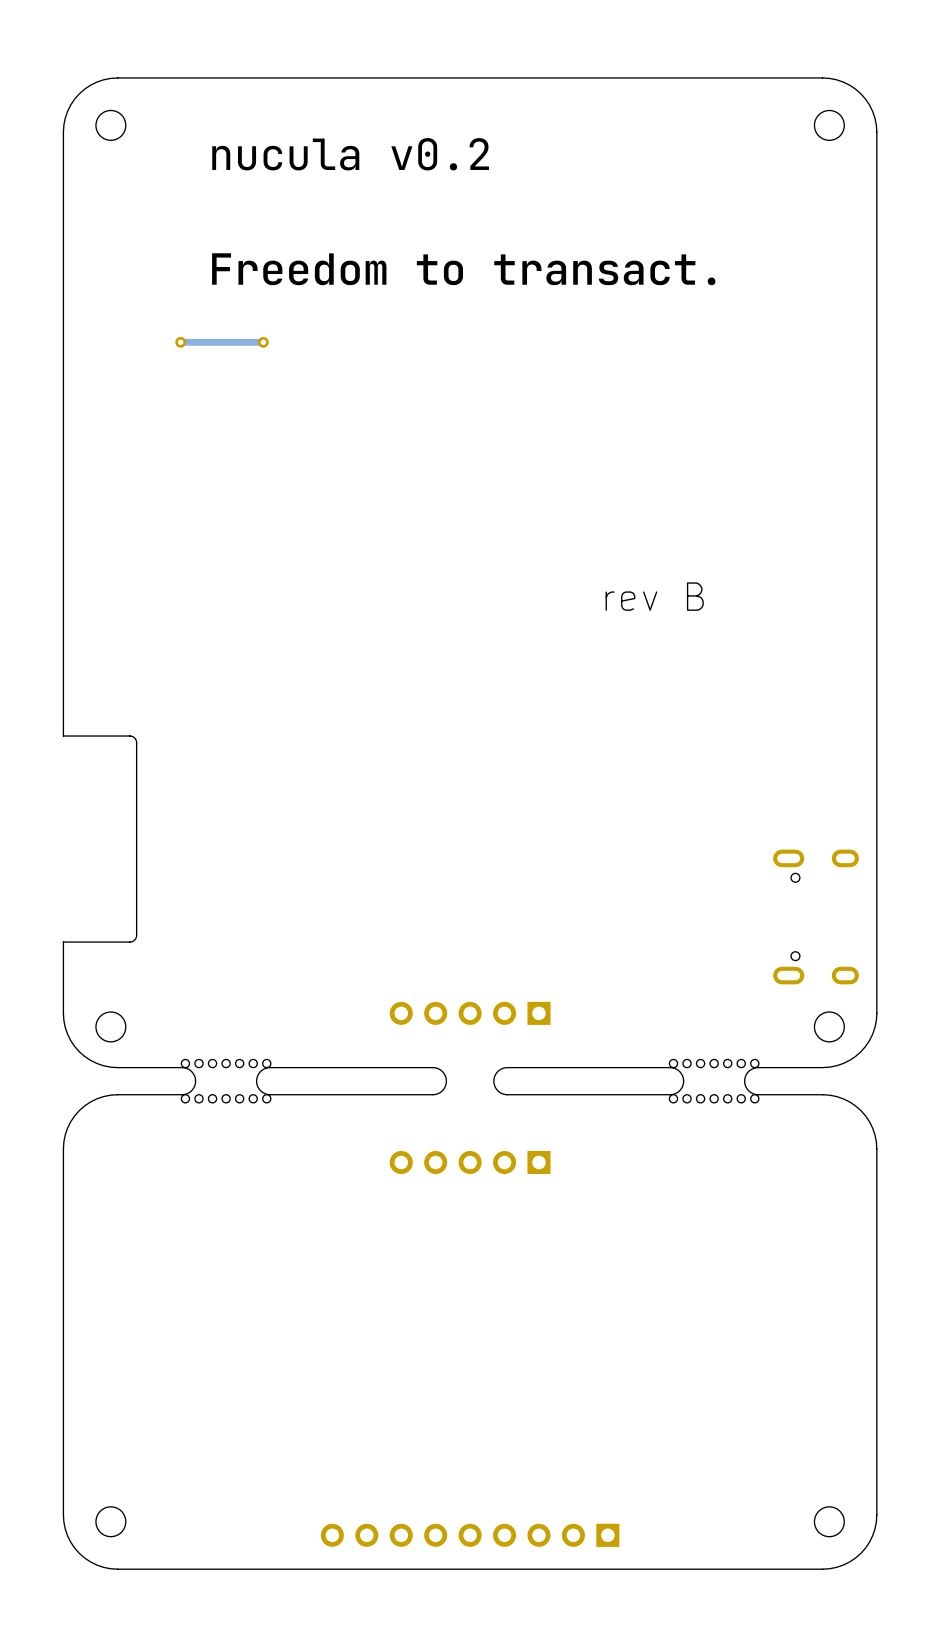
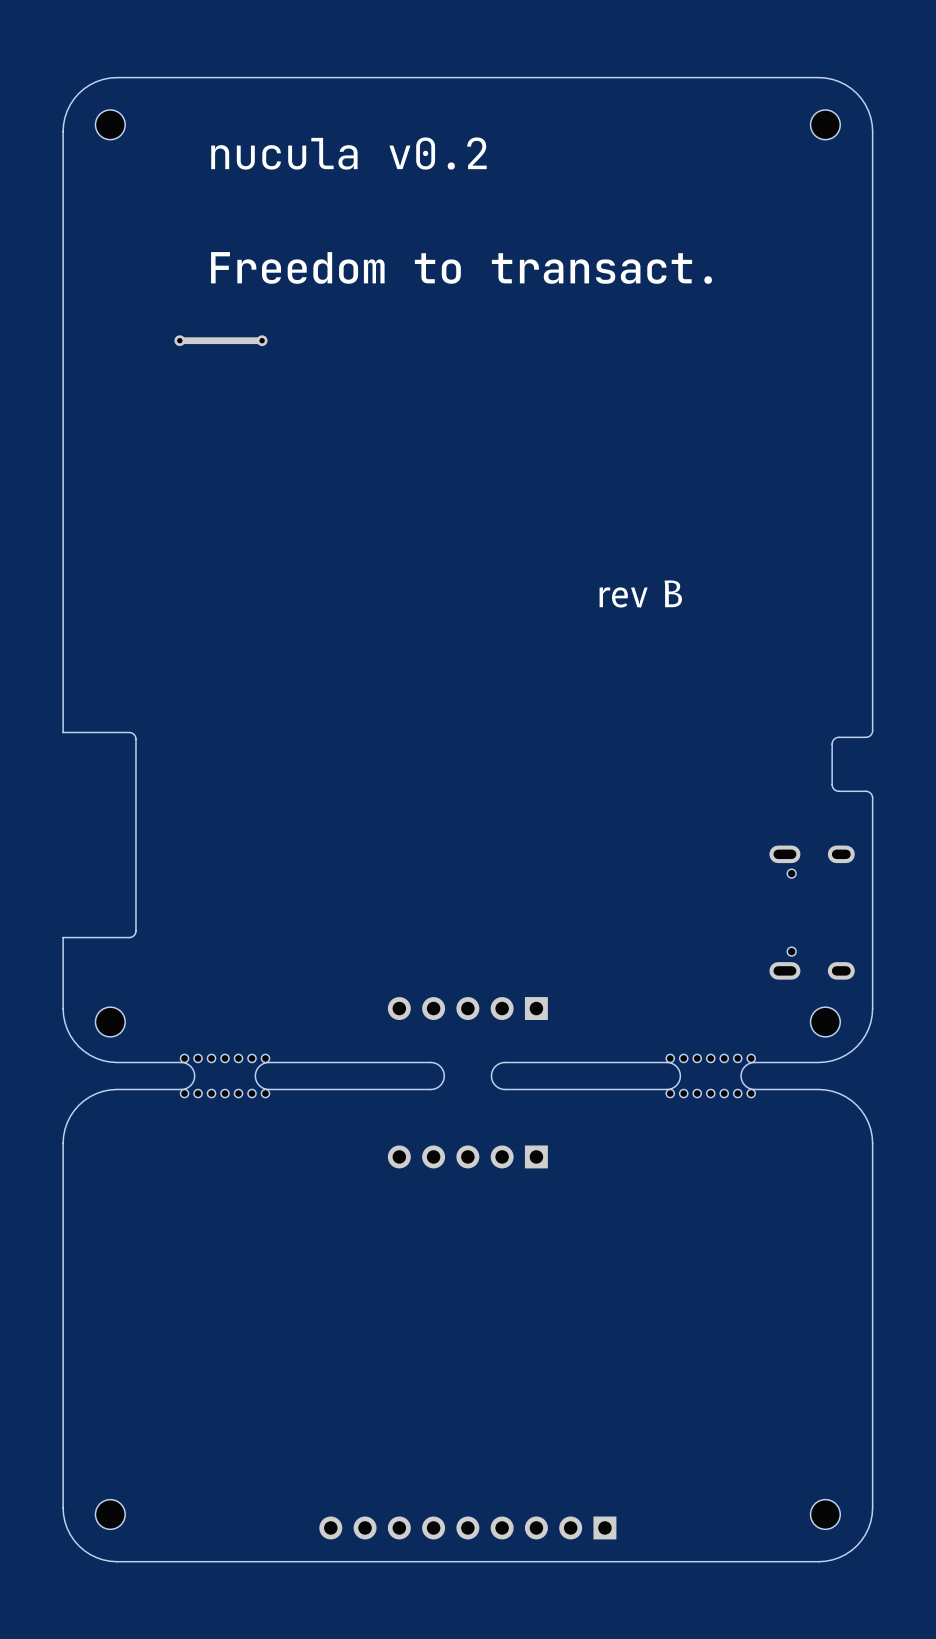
board edge: (876, 734) (876, 801) -> (872, 730) (867, 737) (838, 737) (834, 739) (832, 744) (833, 788) (838, 791) (867, 791) (872, 798)

